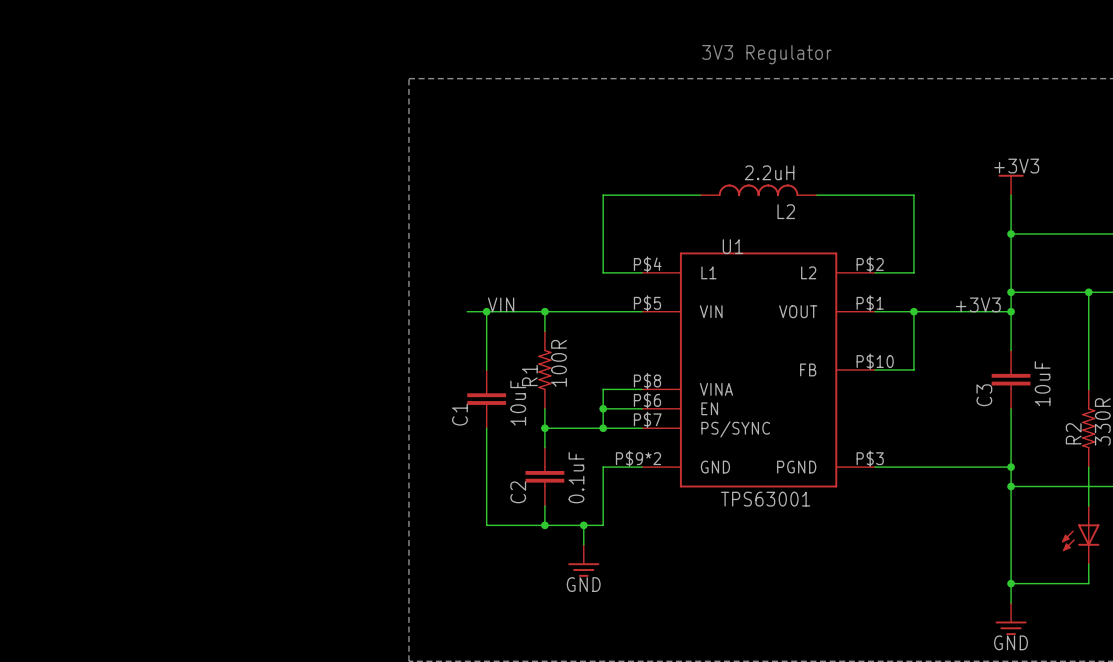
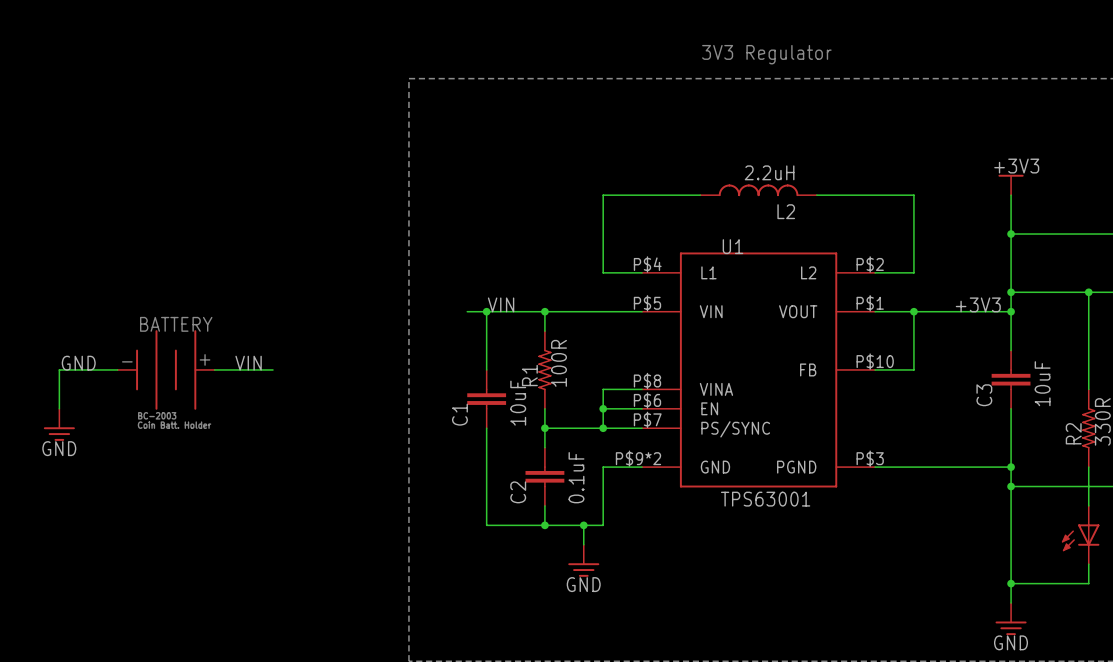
label: none -> GND (78, 363)
label: none -> VIN (248, 363)
wire: none -> (117, 369) (59, 369) (59, 408)
BATTERY: none -> (166, 369)
wire: none -> (214, 369) (273, 369)
power symbol: none -> GND (59, 424)

